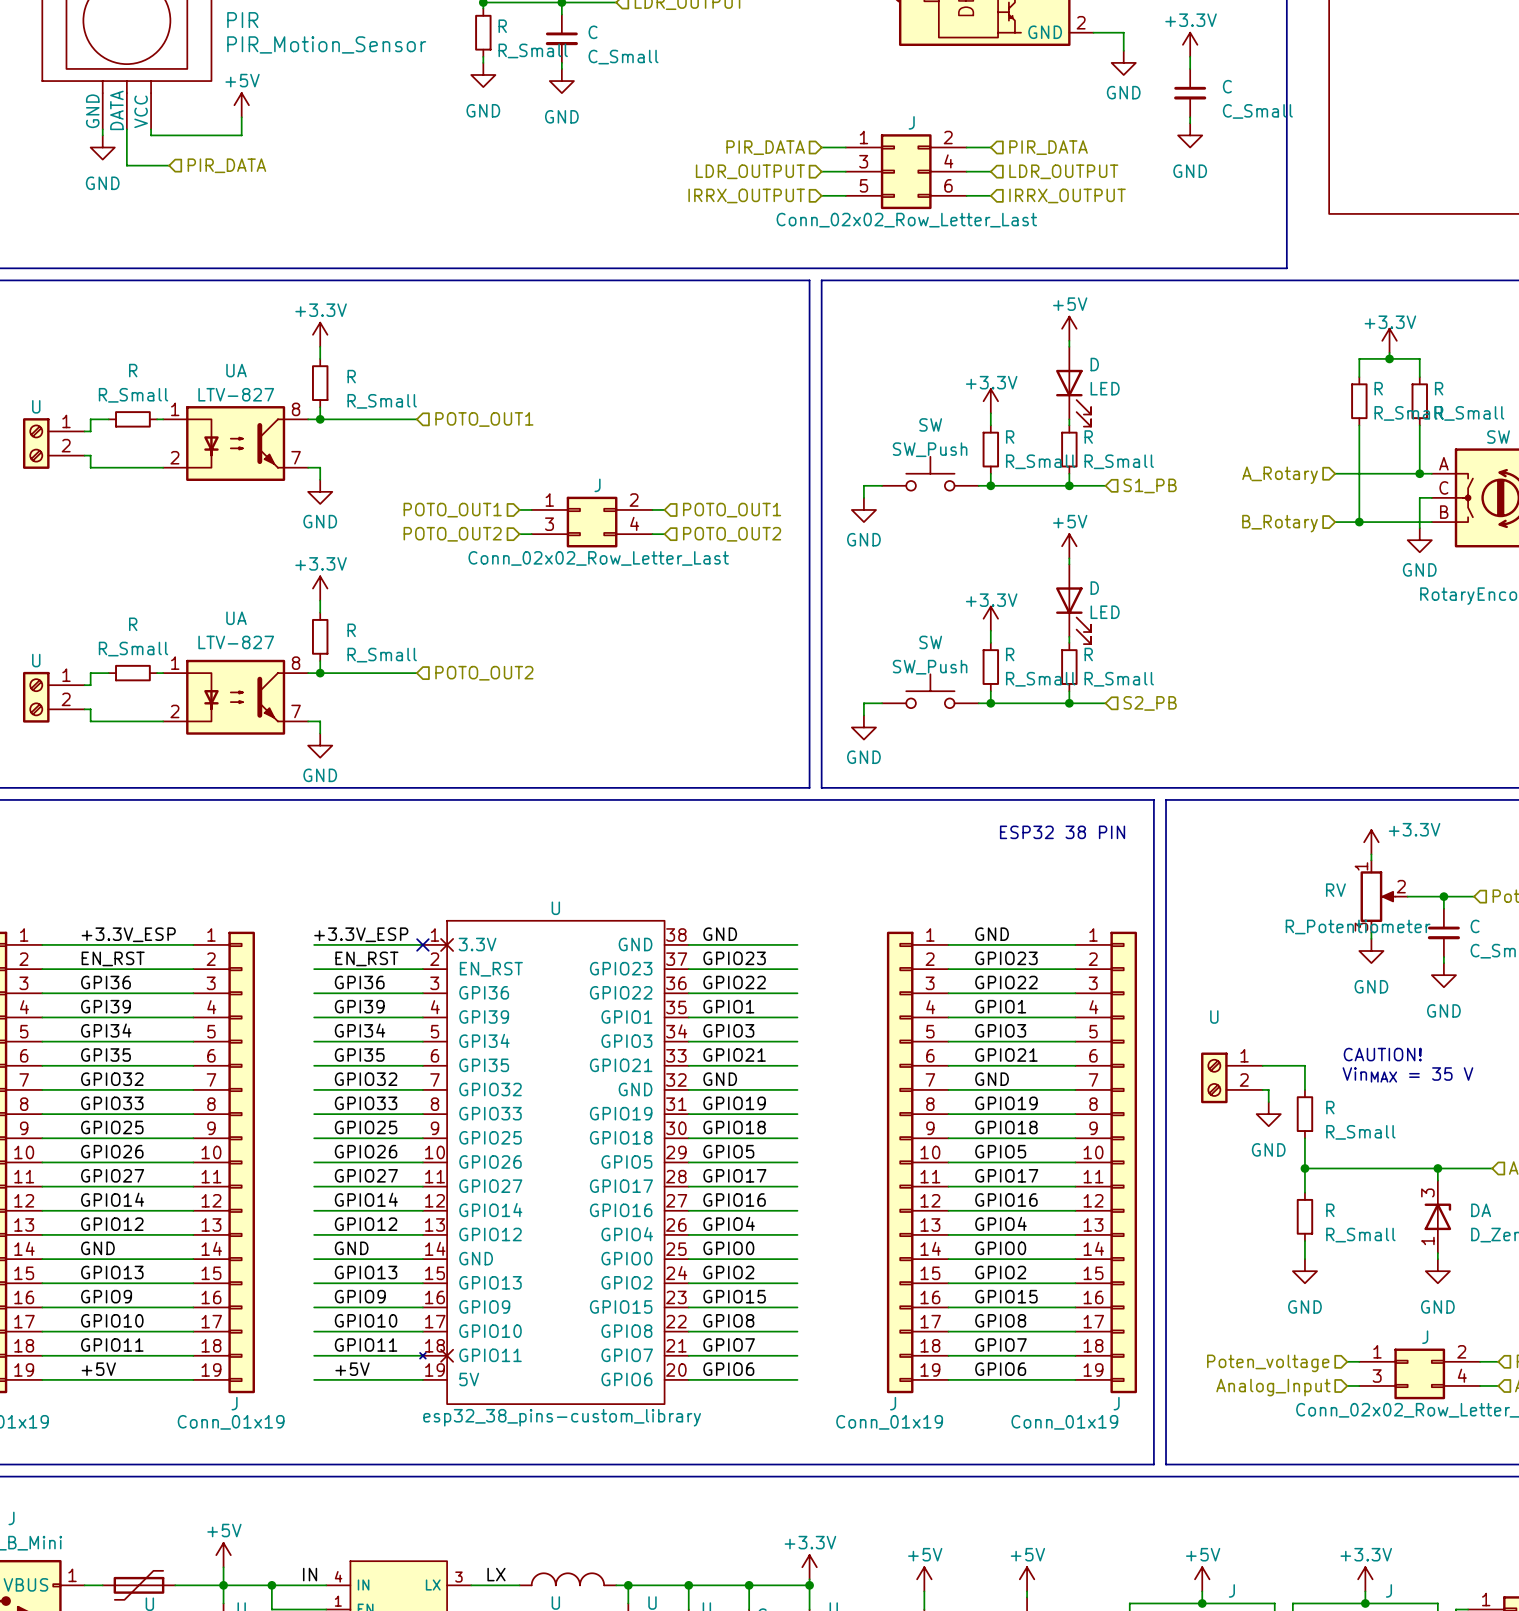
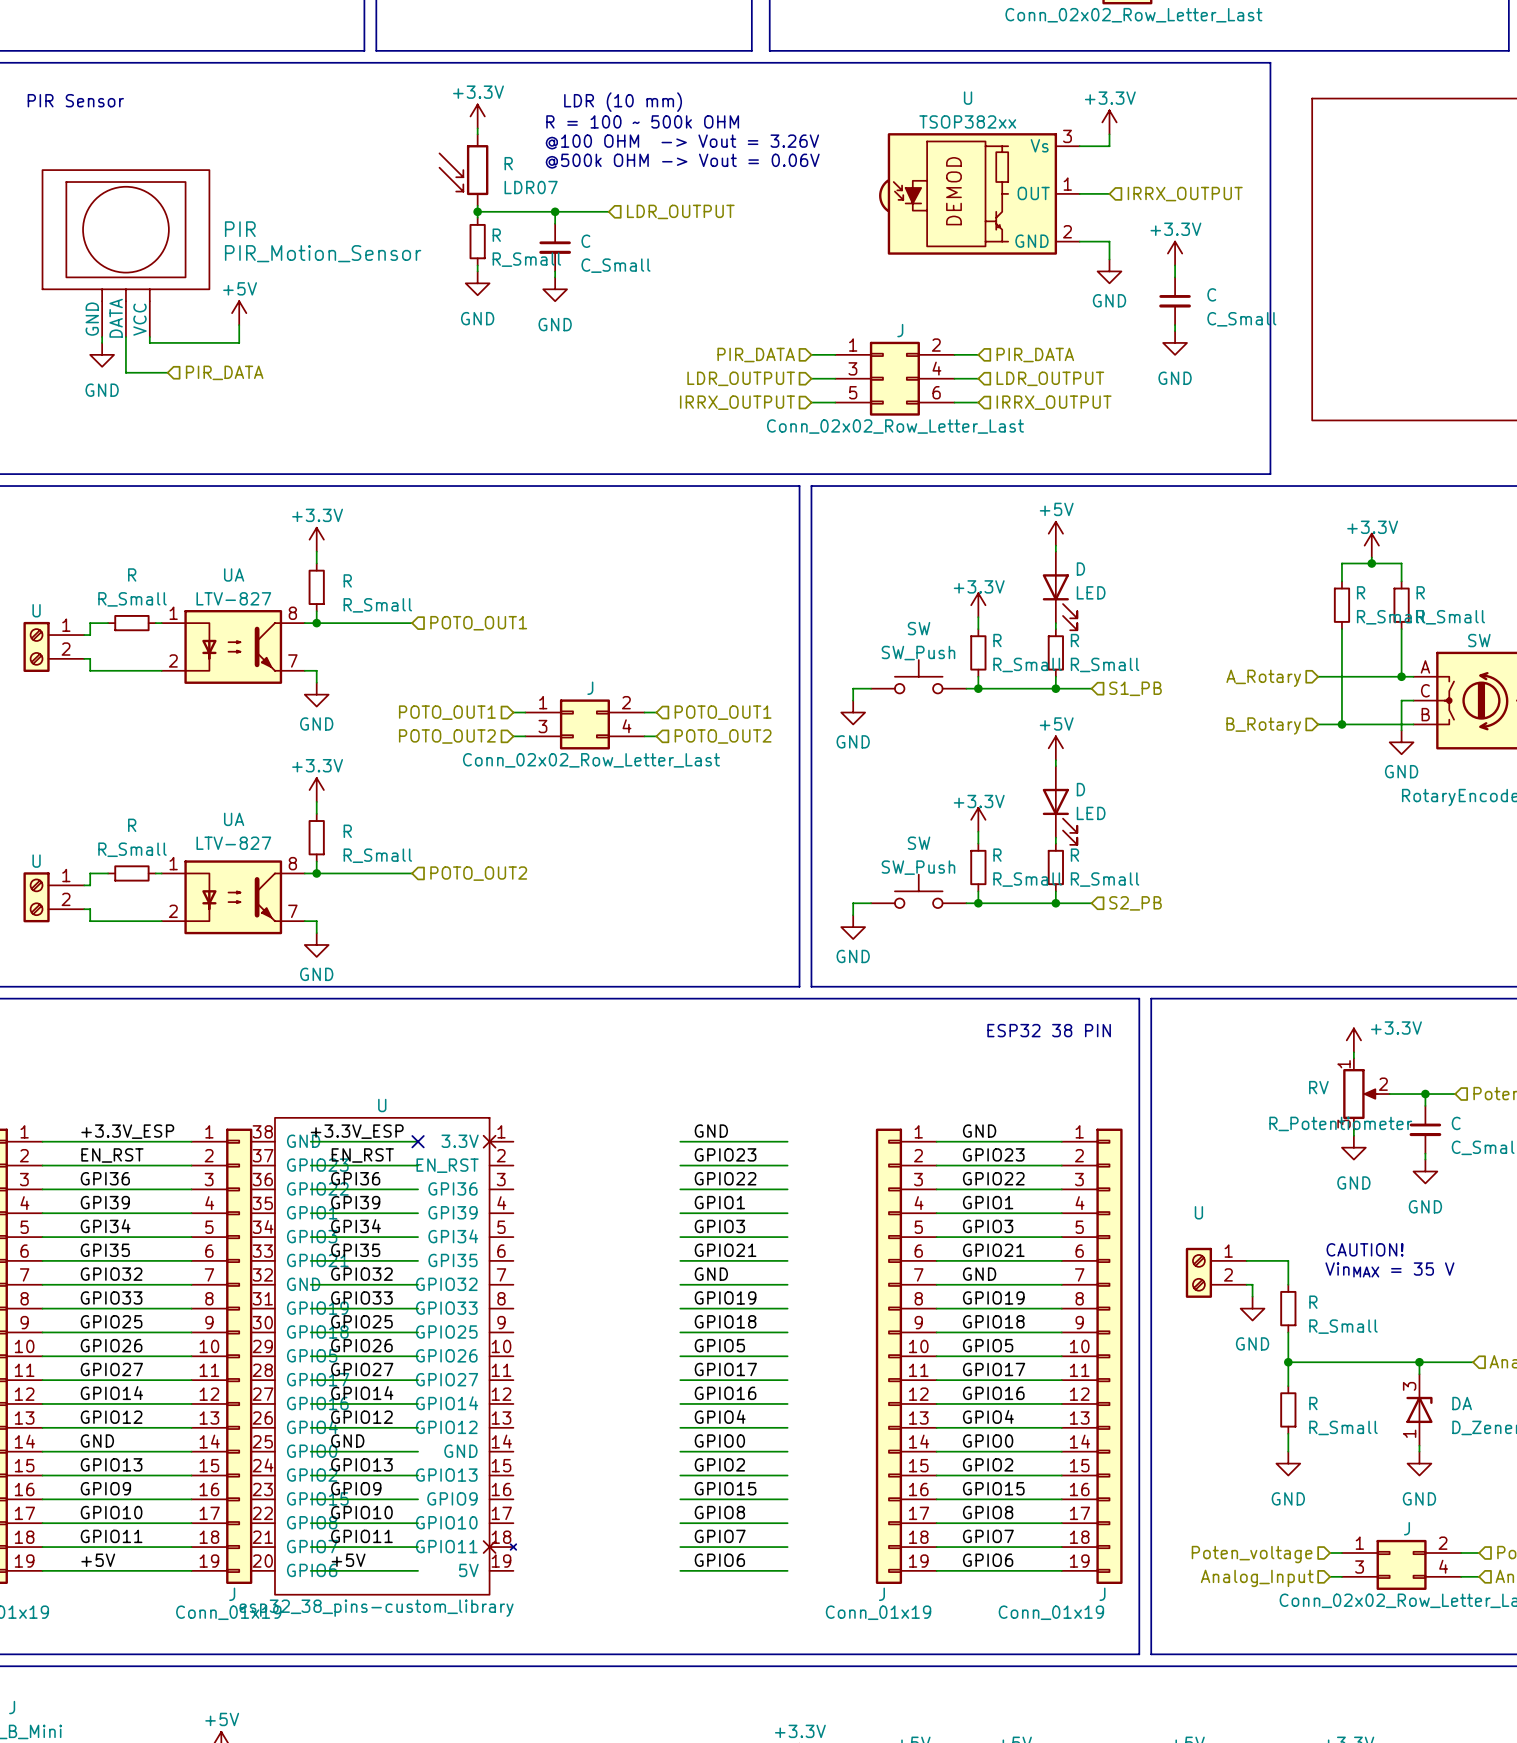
U: none -> esp32_38_pins-custom_library (383, 1356)
U: esp32_38_pins-custom_library (554, 1162) -> none

